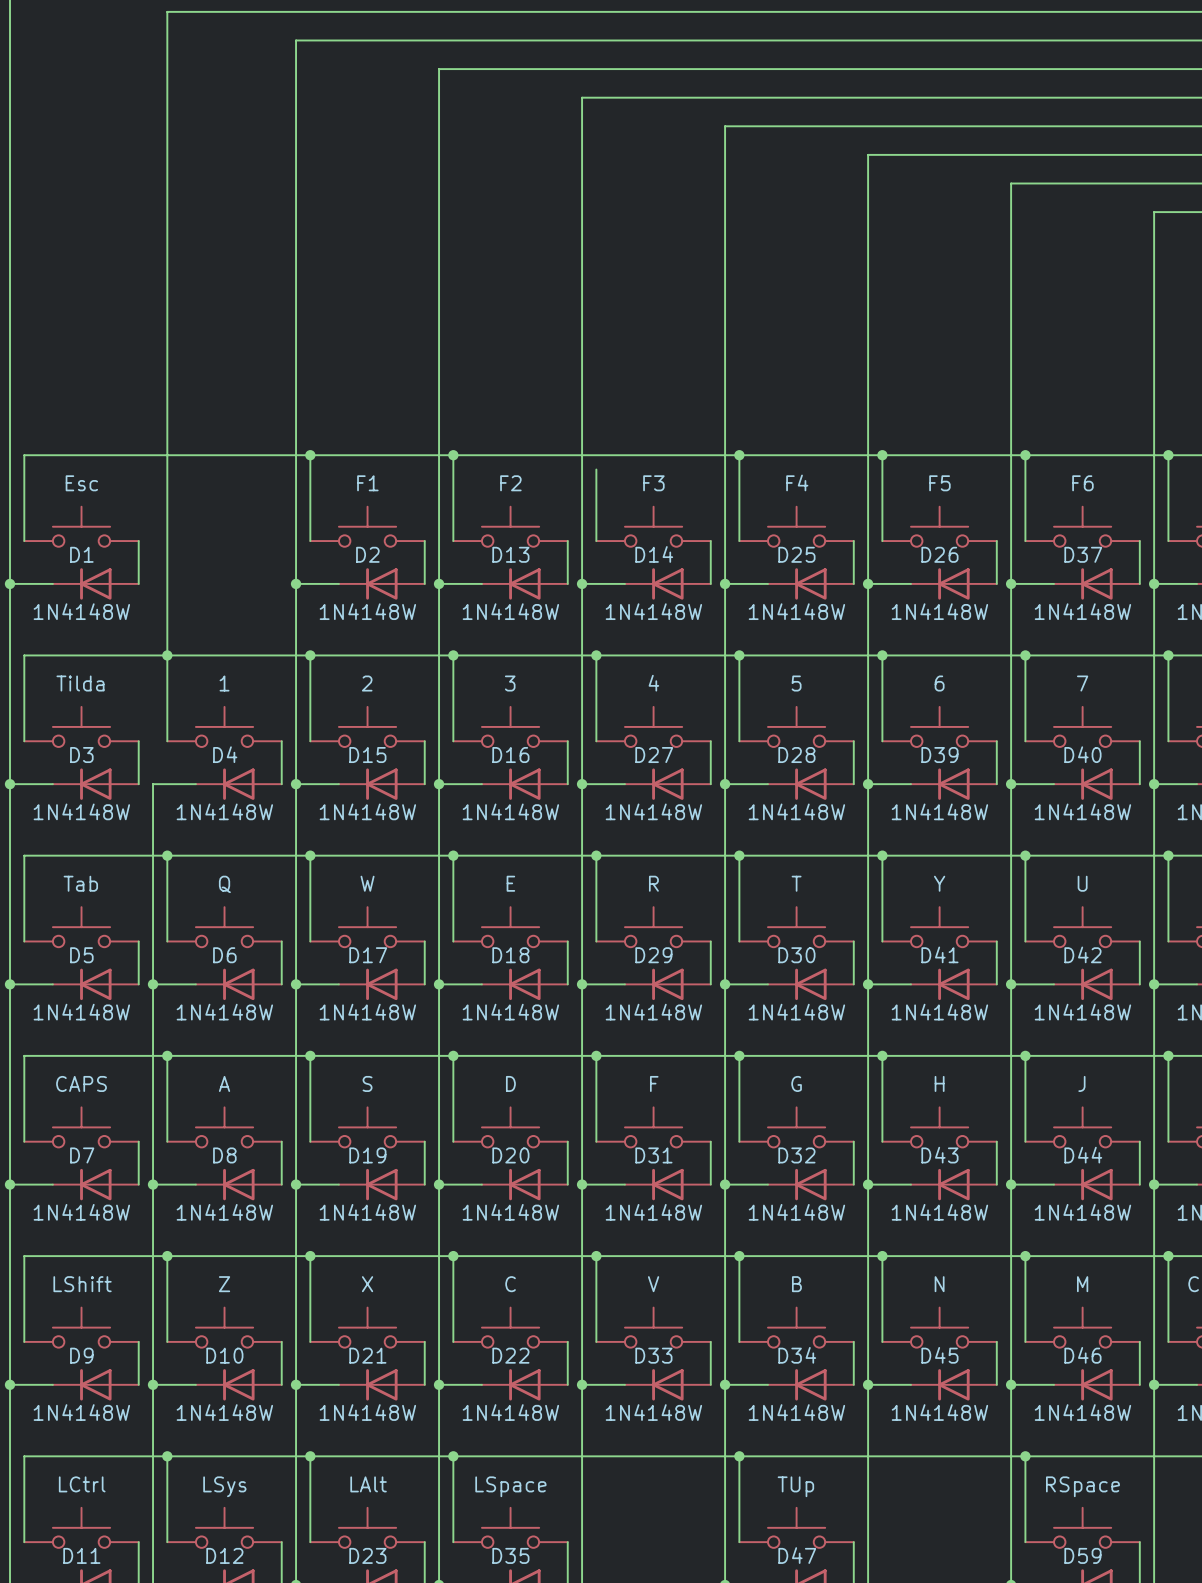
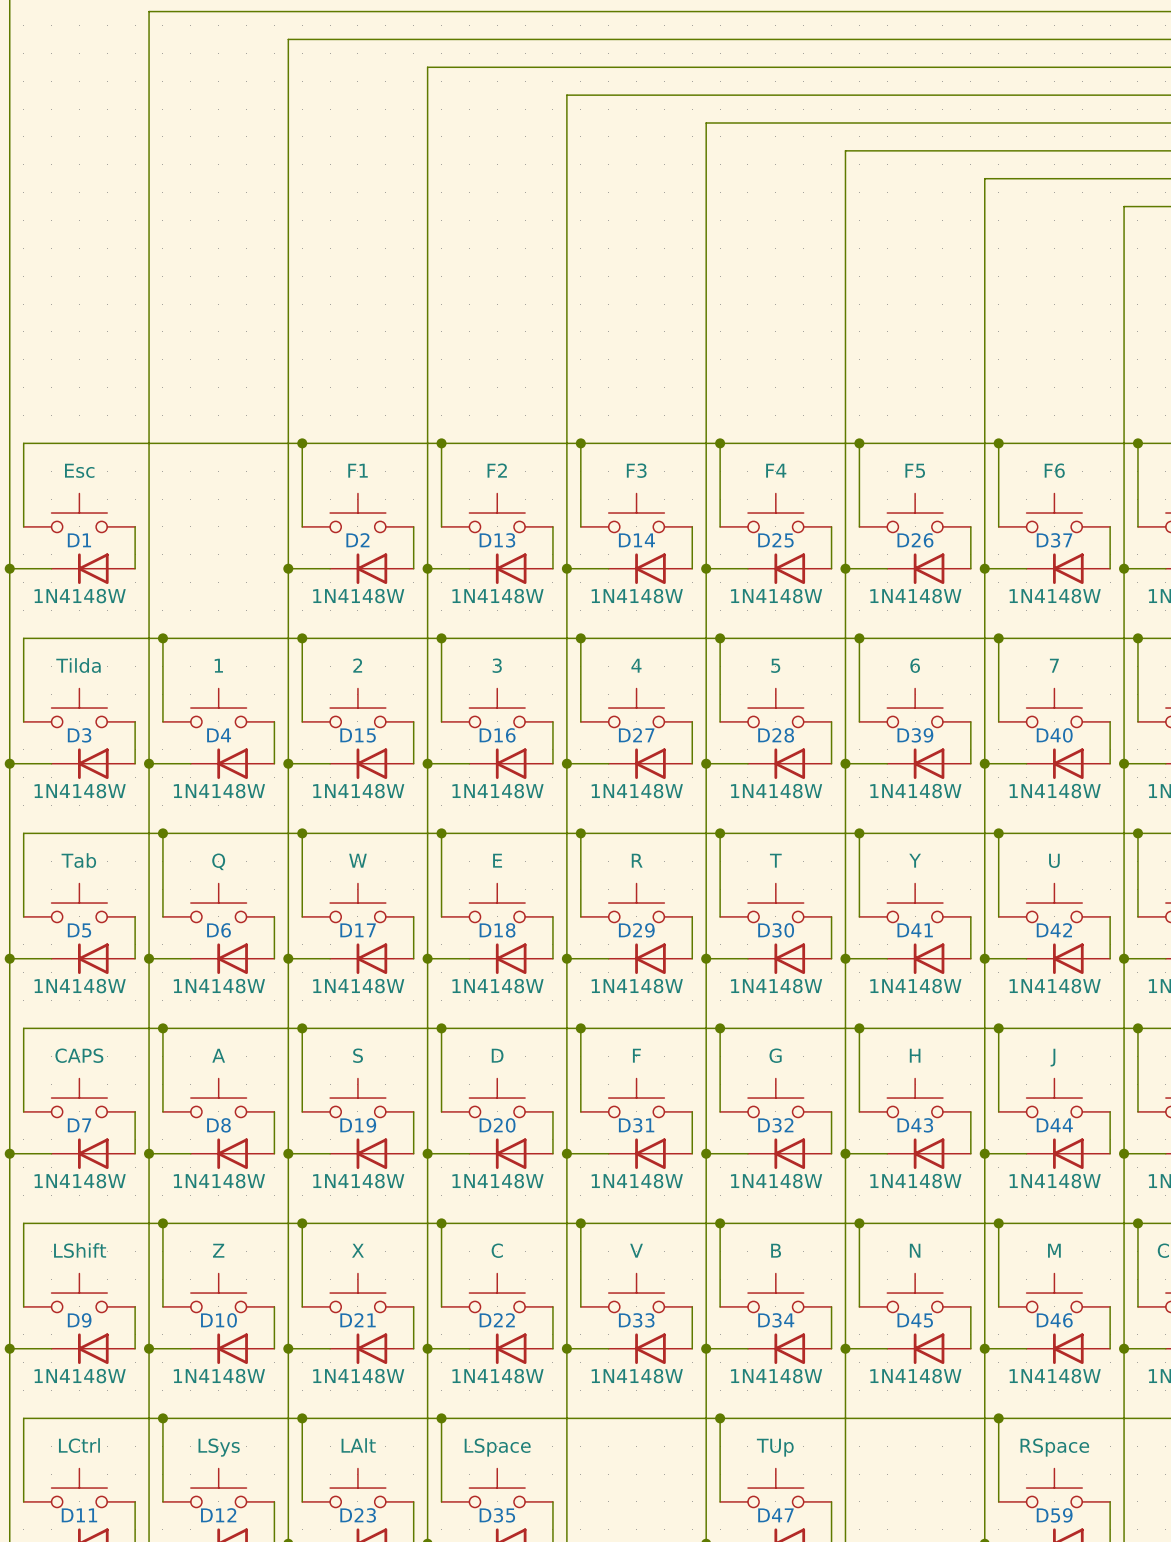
wire: (167, 11) (167, 655) -> (162, 11) (149, 11) (149, 763)
wire: none -> (580, 443) (580, 457)
junction: none -> (580, 443)
junction: none -> (149, 763)

